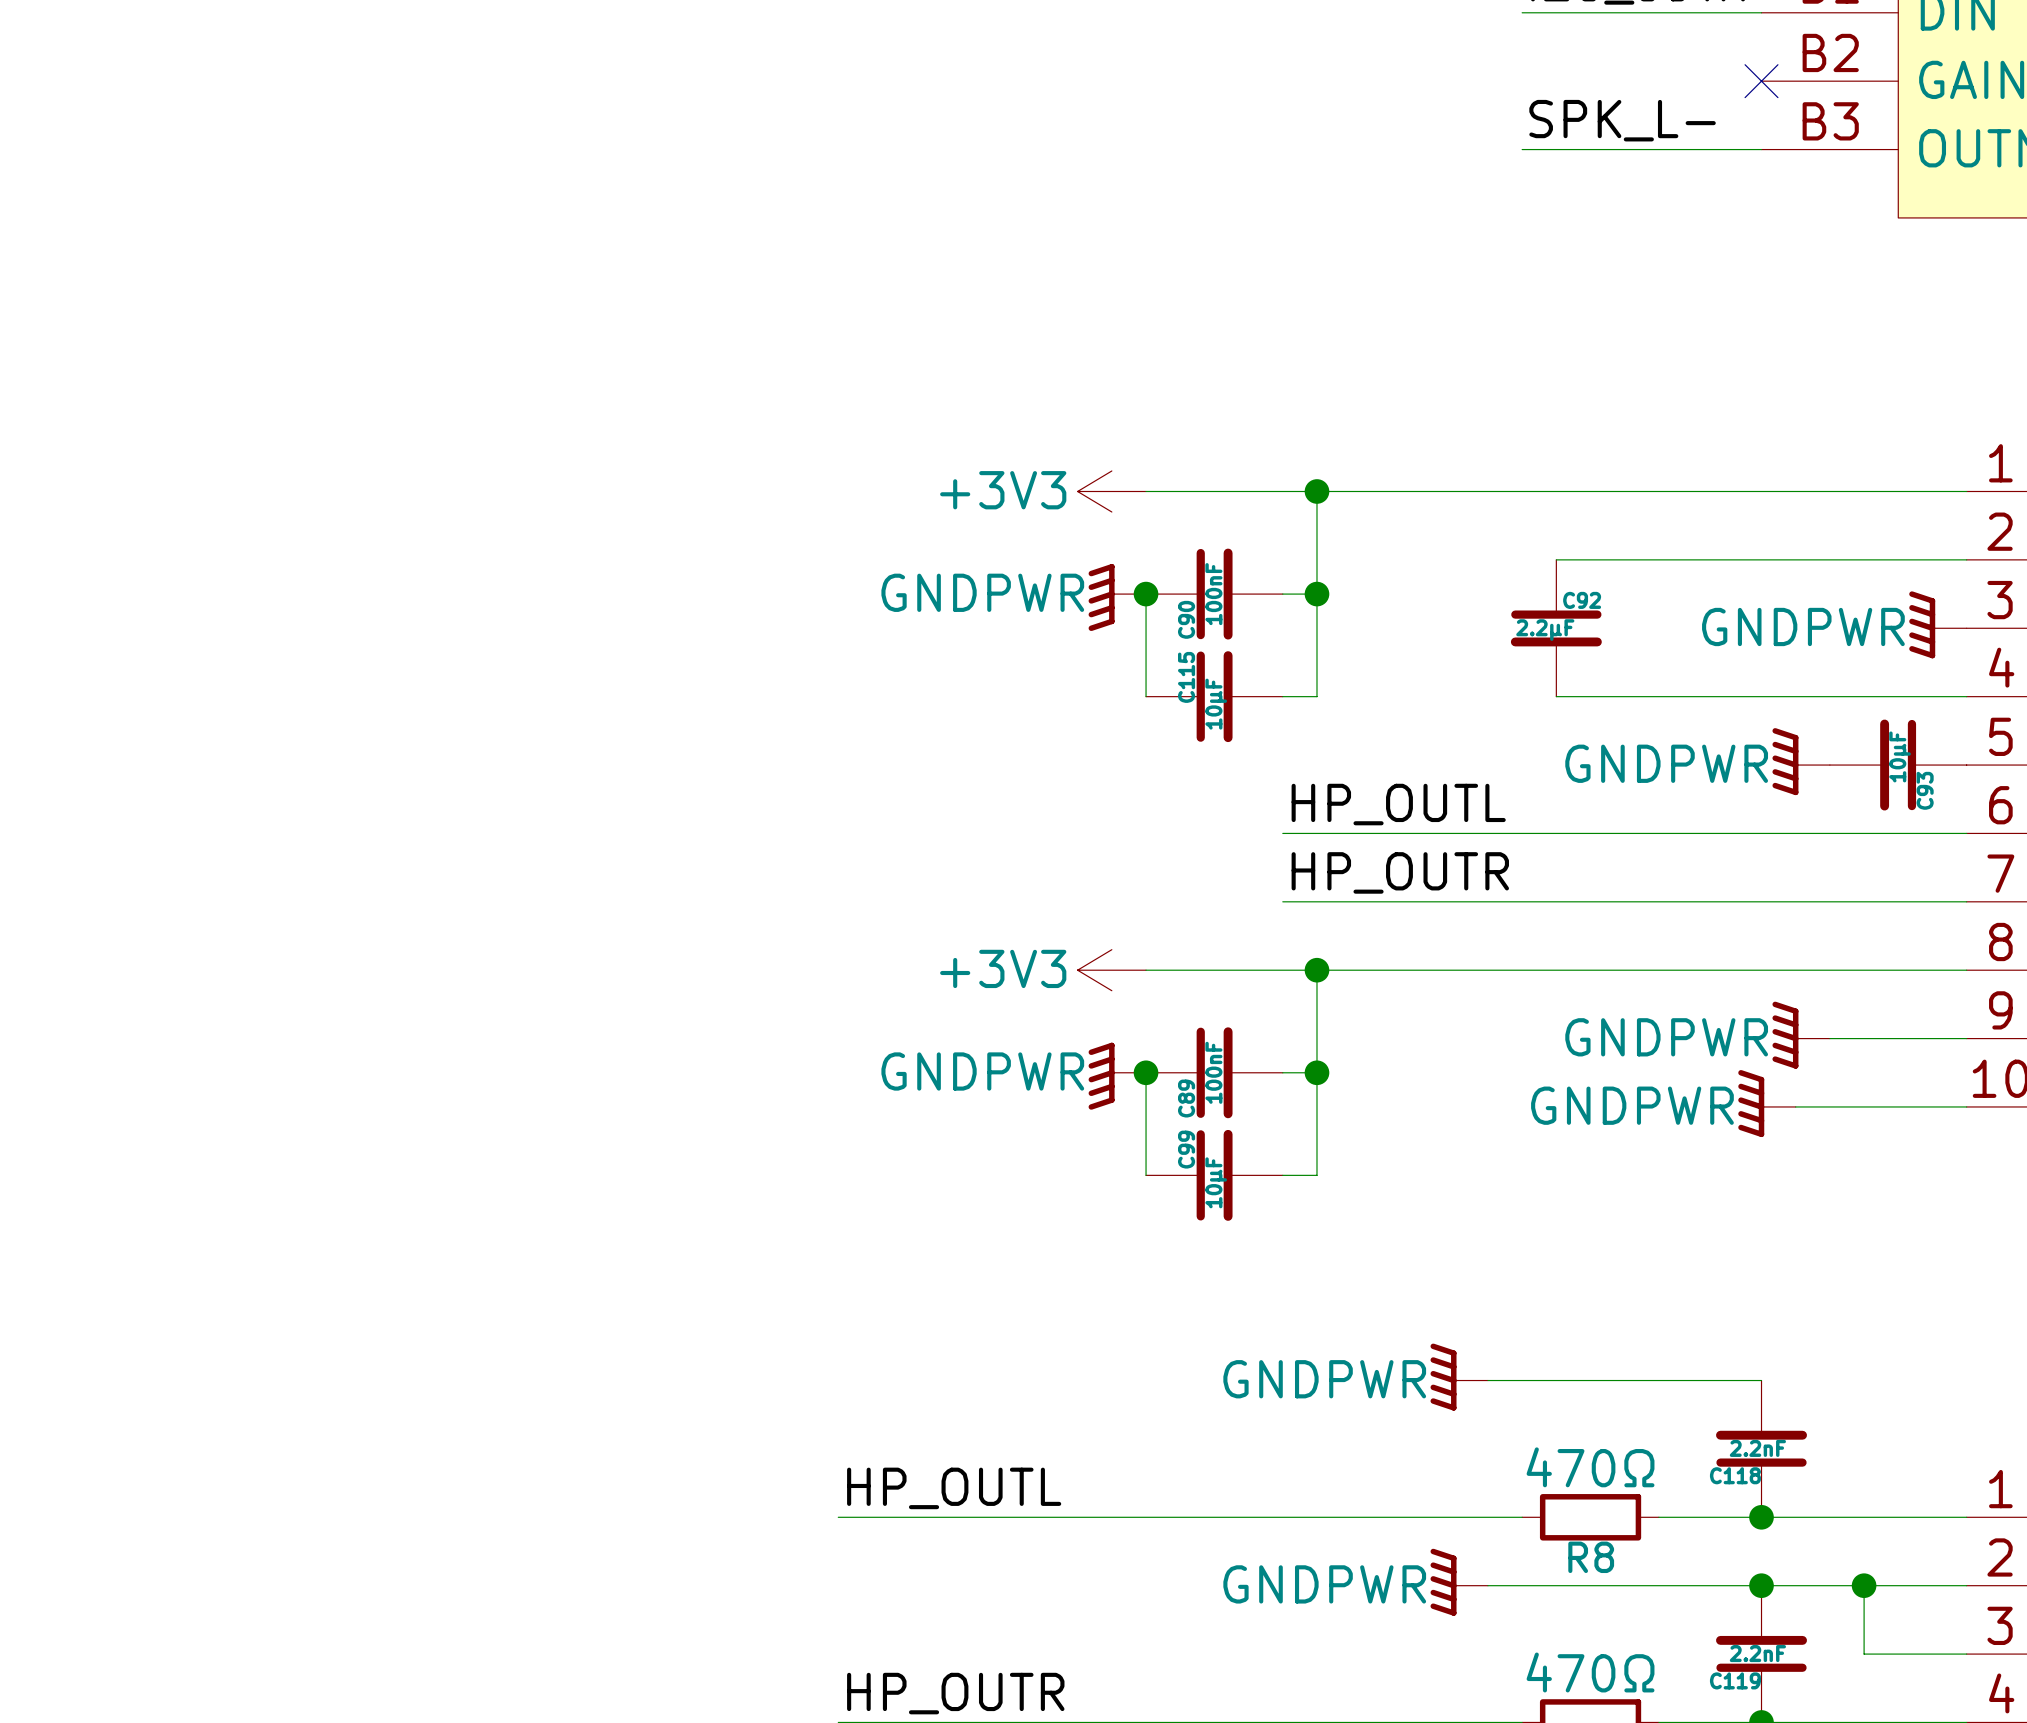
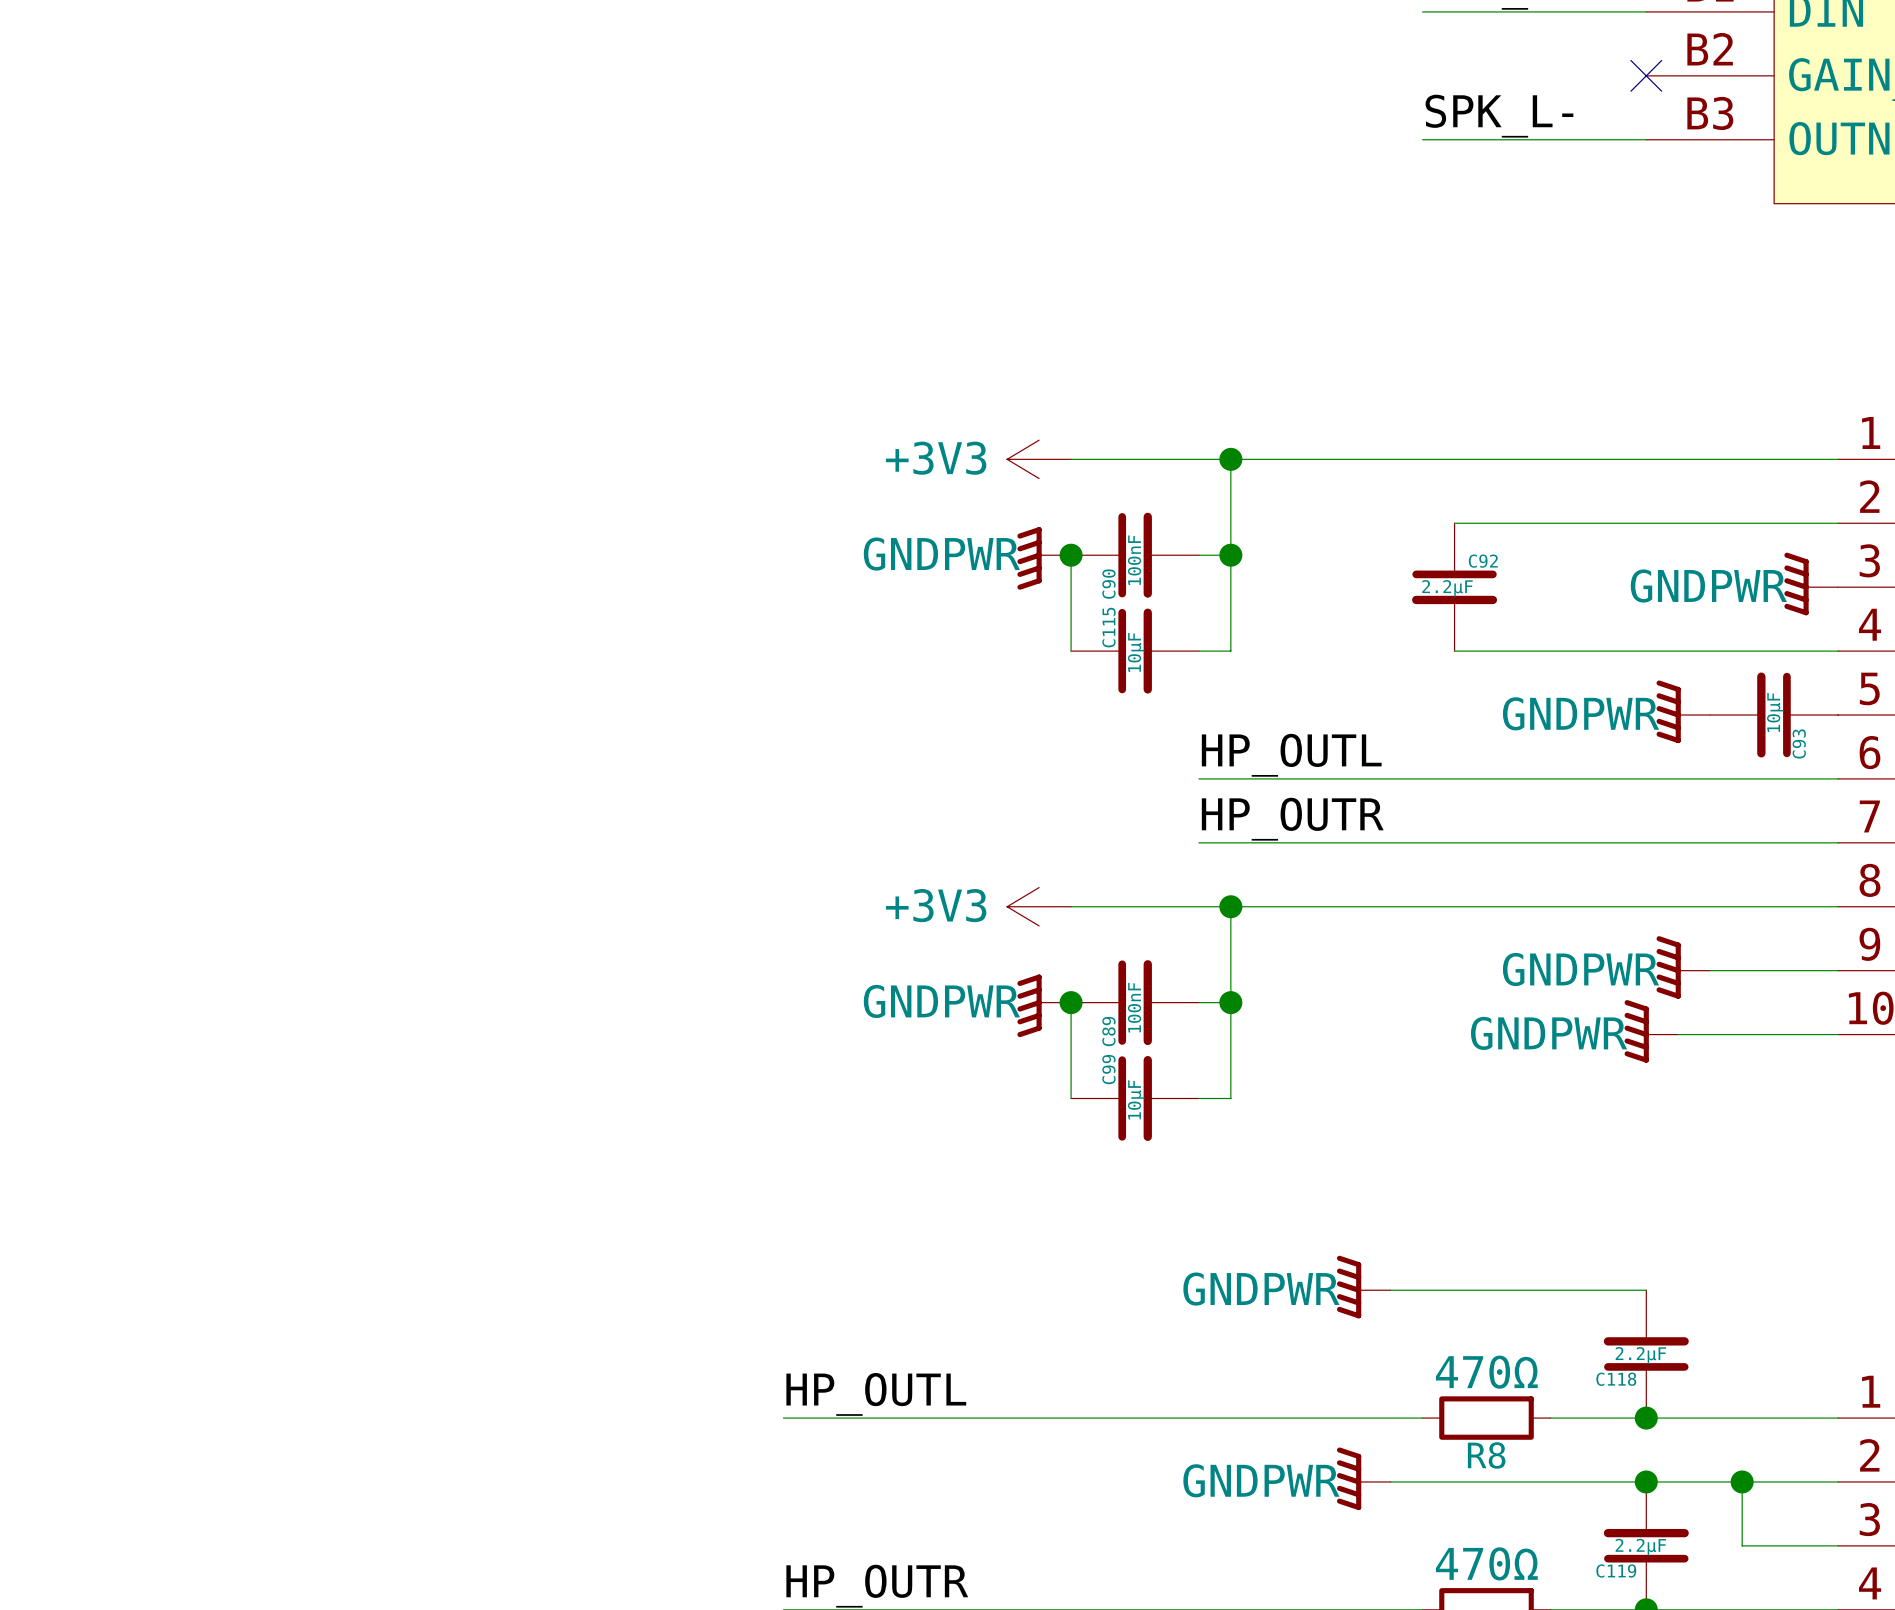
C118 value: 2.2nF (1757, 1448) -> 2.2μF (1640, 1355)
C119 value: 2.2nF (1757, 1653) -> 2.2μF (1640, 1547)

